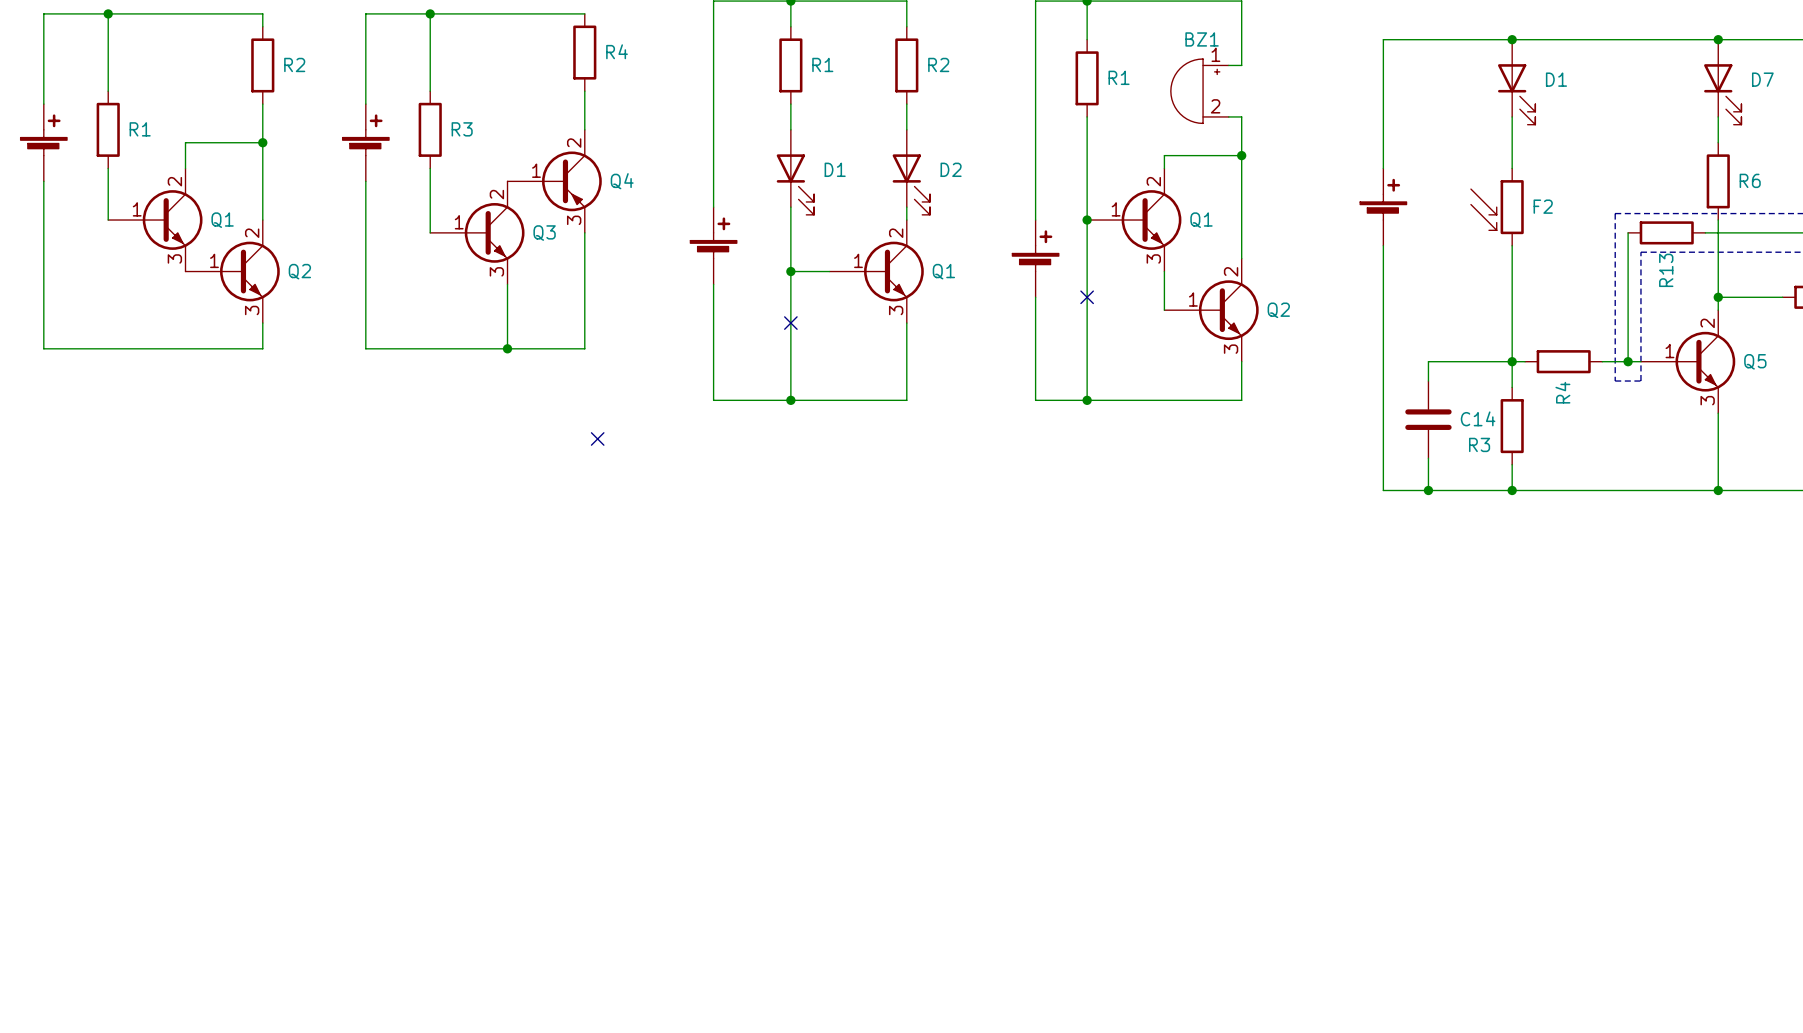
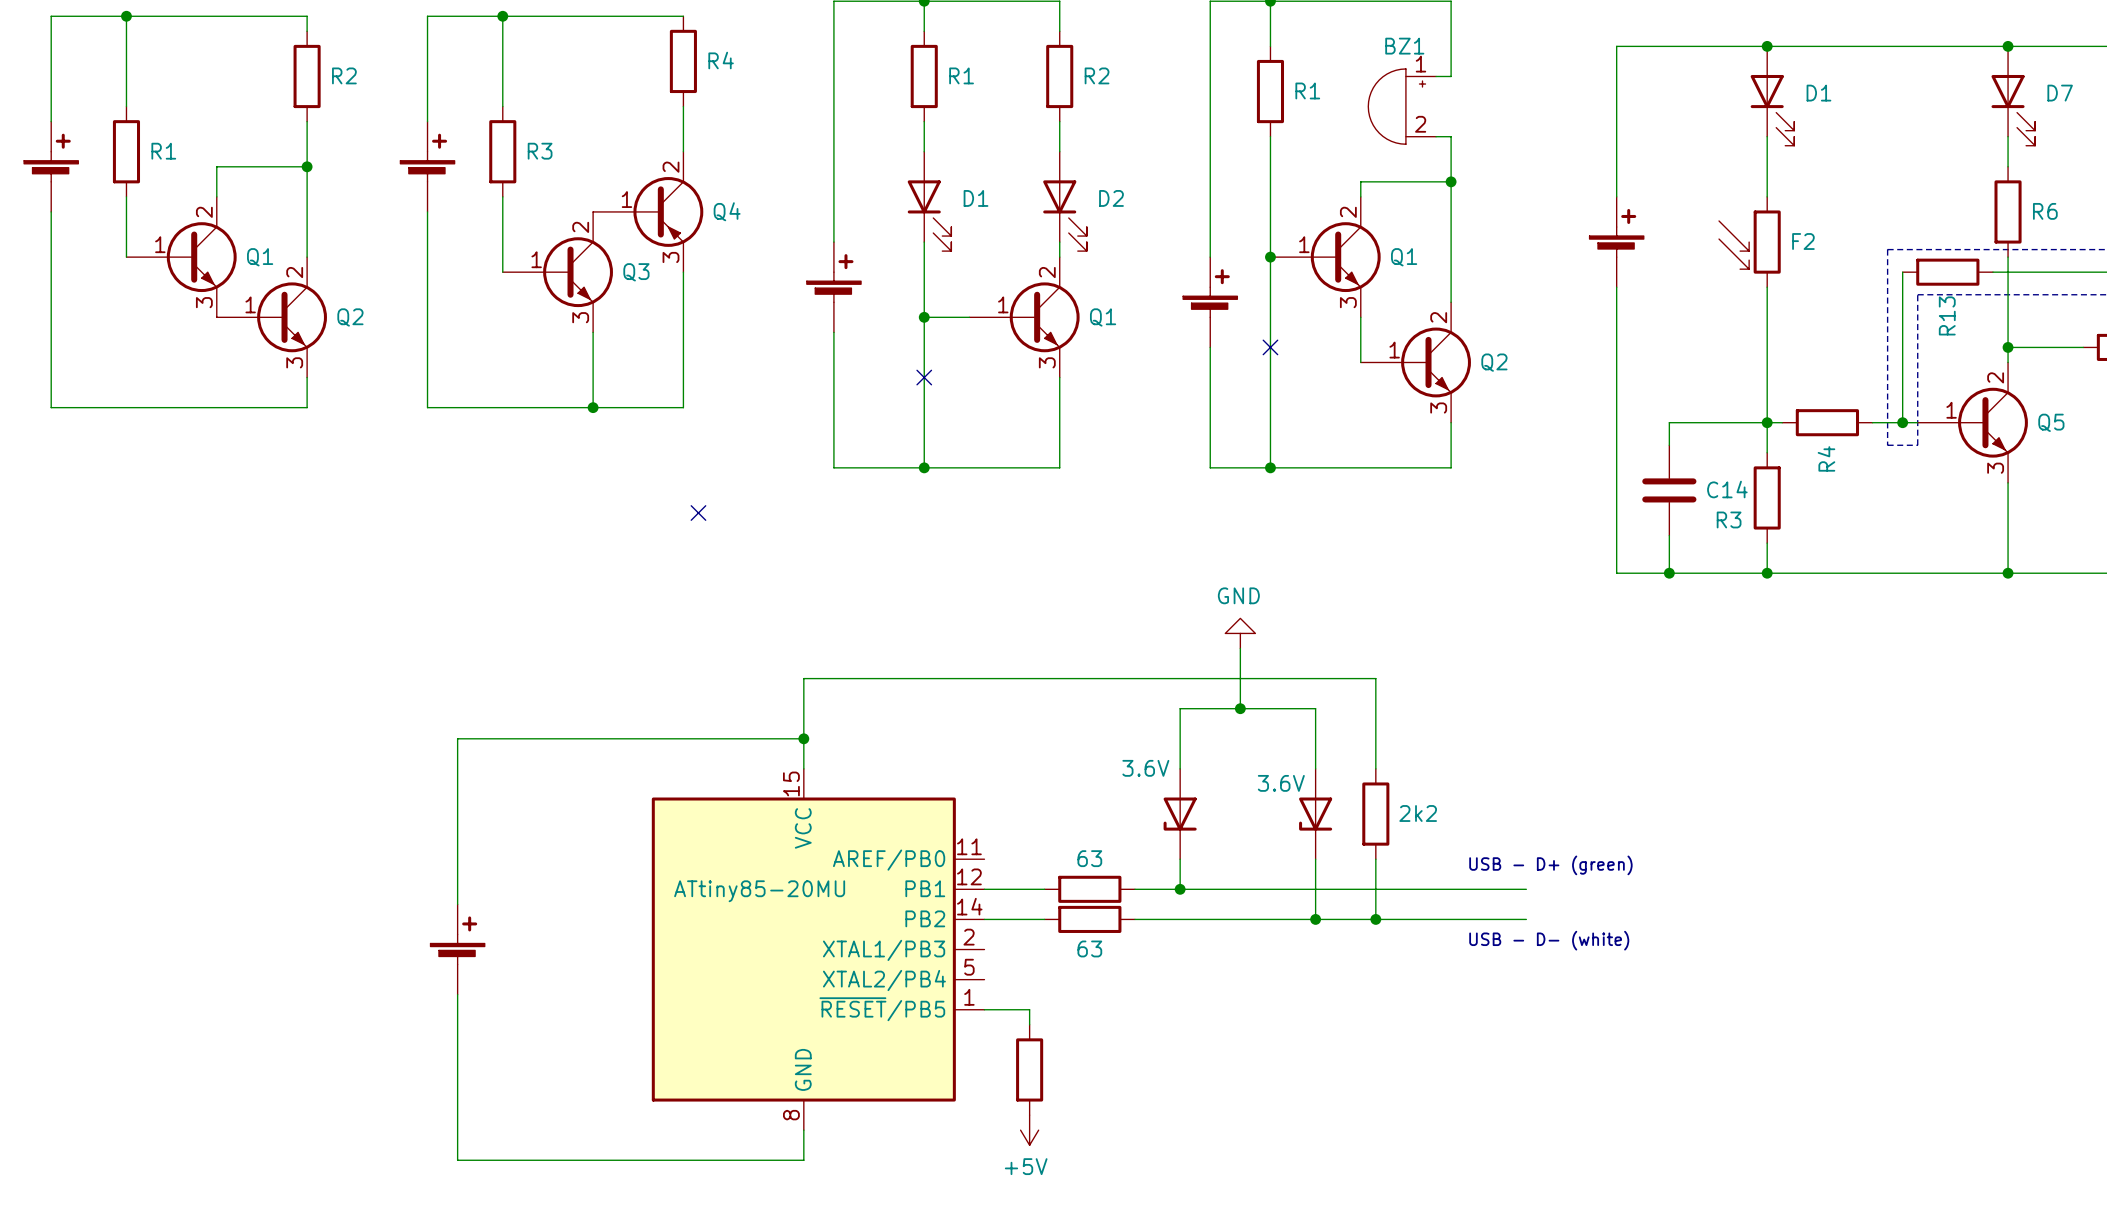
power symbol: none -> GND (1240, 633)
wire: none -> (1240, 648) (1240, 708)
junction: none -> (1240, 708)
wire: none -> (803, 738) (457, 738) (457, 904)
junction: none -> (803, 738)
wire: none -> (803, 768) (803, 678) (1375, 678) (1375, 768)
wire: none -> (1180, 768) (1180, 708) (1315, 708) (1315, 768)
part: none -> 3.6V (1180, 814)
part: none -> 3.6V (1315, 814)
part: none -> 2k2 (1375, 814)
wire: none -> (1180, 859) (1180, 889)
wire: none -> (1315, 859) (1315, 919)
wire: none -> (1375, 859) (1375, 919)
text: none -> USB - D+ (green) (1550, 865)
wire: none -> (984, 889) (1044, 889)
part: none -> 63 (1089, 889)
wire: none -> (1134, 889) (1526, 889)
junction: none -> (1180, 889)
wire: none -> (984, 919) (1044, 919)
part: none -> 63 (1089, 919)
wire: none -> (1134, 919) (1526, 919)
junction: none -> (1315, 919)
junction: none -> (1375, 919)
text: none -> USB - D- (white) (1549, 940)
part: none -> (457, 949)
part: none -> ATtiny85-20MU (818, 949)
wire: none -> (457, 994) (457, 1160) (803, 1160) (803, 1130)
wire: none -> (984, 1009) (1029, 1009) (1029, 1024)
part: none -> (1029, 1069)
power symbol: none -> +5V (1029, 1130)

